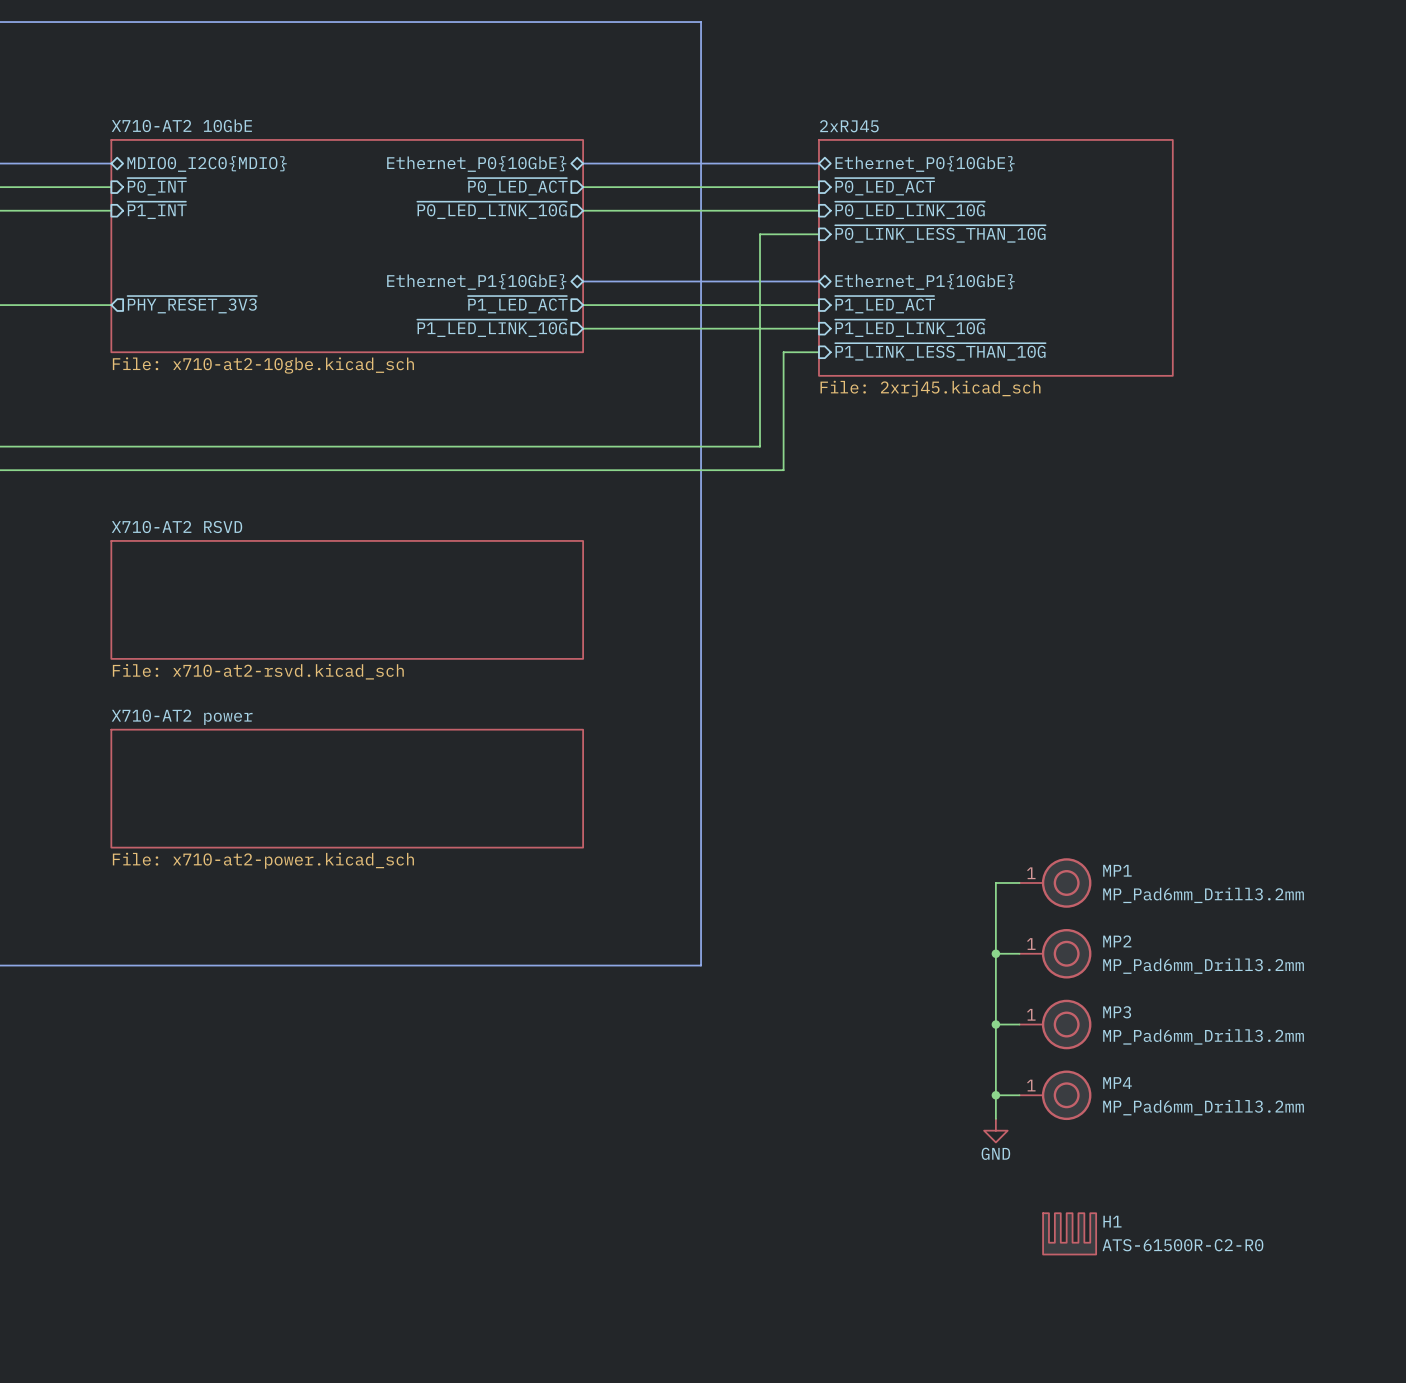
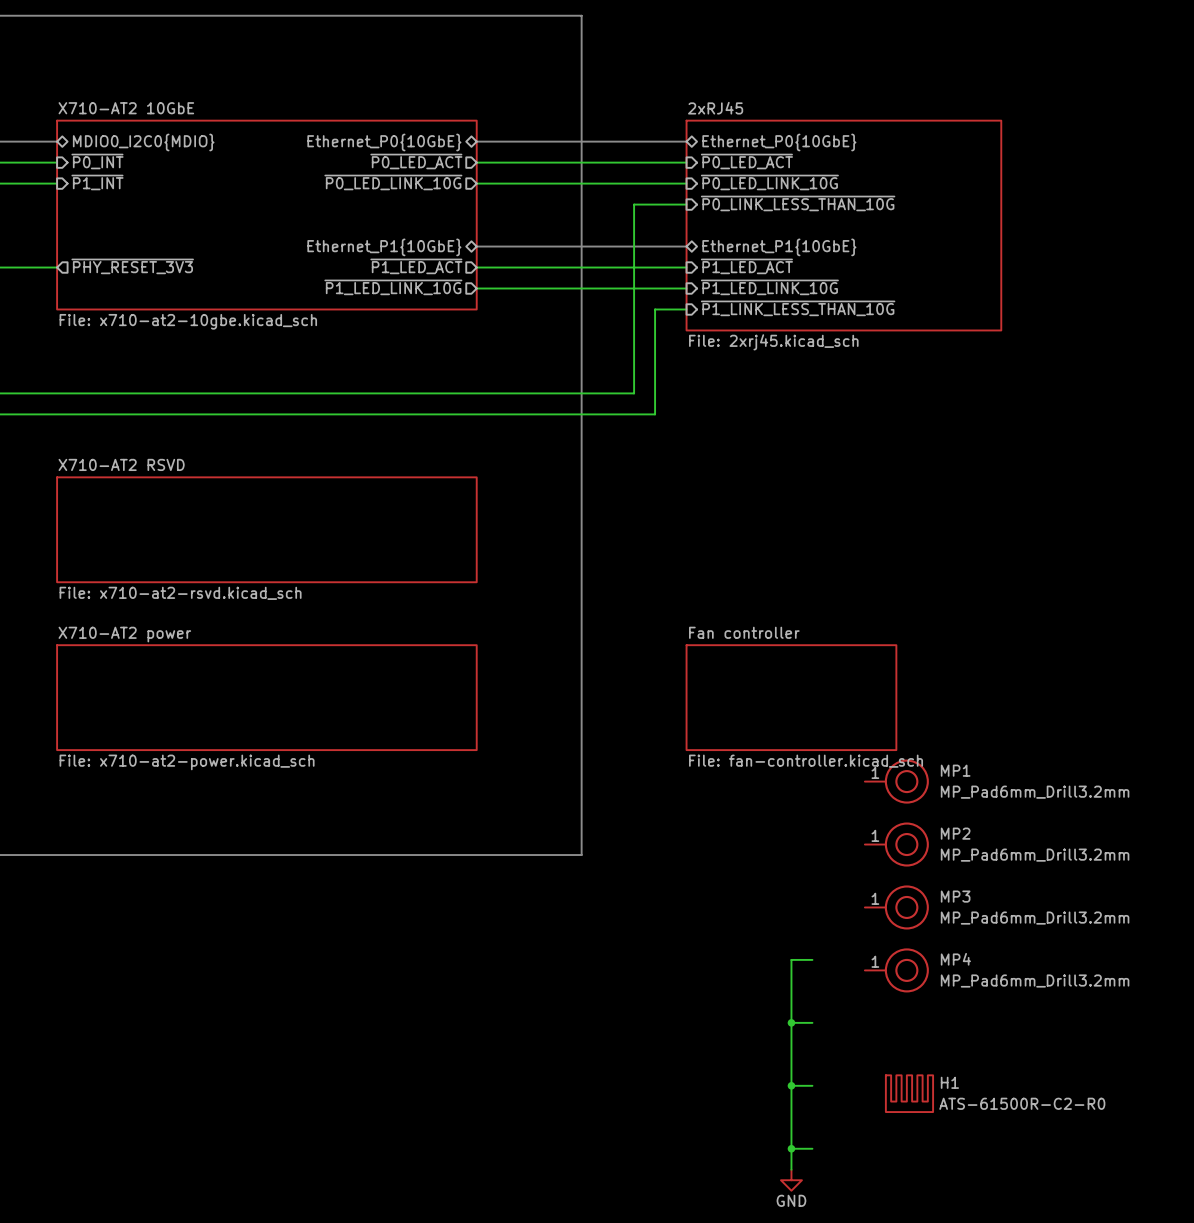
sheet Fan controller: none -> File: fan-controller.kicad_sch (791, 697)
wire: (1019, 882) (995, 882) (995, 1118) -> (812, 959) (791, 959) (791, 1169)
wire: (995, 953) (1019, 953) -> (791, 1022) (812, 1022)
junction: (995, 953) -> none
wire: (995, 1024) (1019, 1024) -> (791, 1085) (812, 1085)
junction: (995, 1024) -> none
wire: (995, 1095) (1019, 1095) -> (791, 1148) (812, 1148)
junction: (995, 1095) -> none
power symbol position: GND (995, 1130) -> GND (791, 1180)
junction: none -> (791, 1022)
junction: none -> (791, 1085)
junction: none -> (791, 1148)

